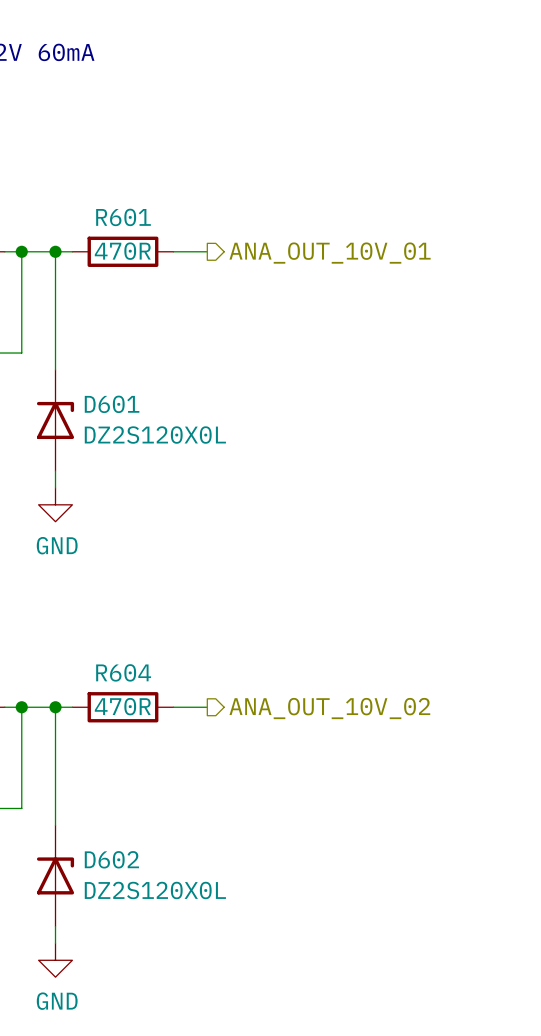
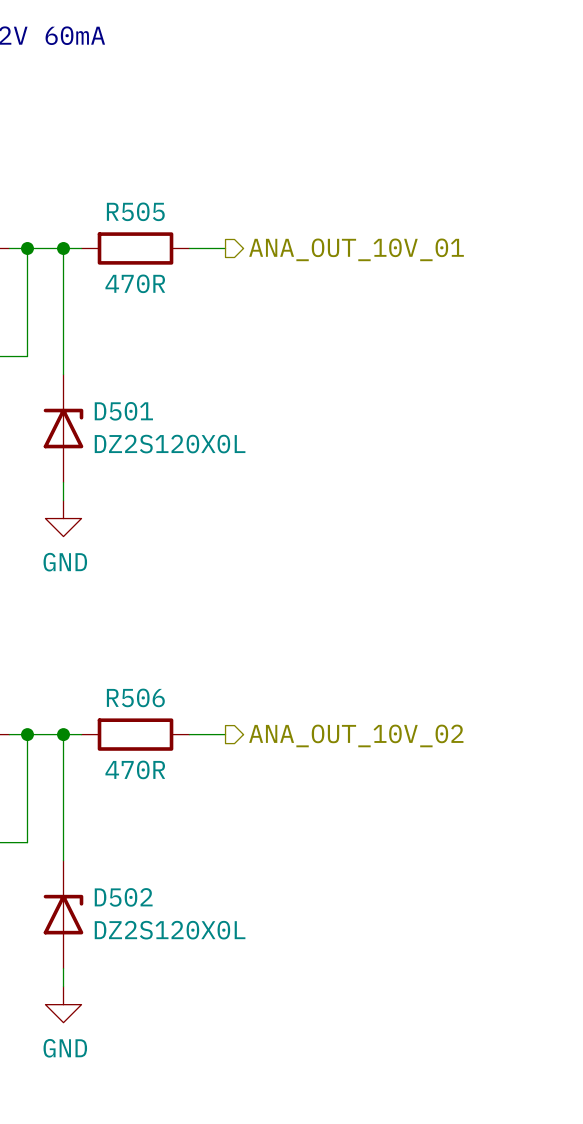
R601 name: R601 (123, 217) -> R505 (135, 211)
R601 value position: 470R (122, 251) -> 470R (135, 283)
D601 name: D601 (112, 404) -> D501 (123, 411)
R604 name: R604 (123, 672) -> R506 (135, 697)
R604 value position: 470R (122, 706) -> 470R (135, 769)
D602 name: D602 (111, 859) -> D502 (123, 897)

